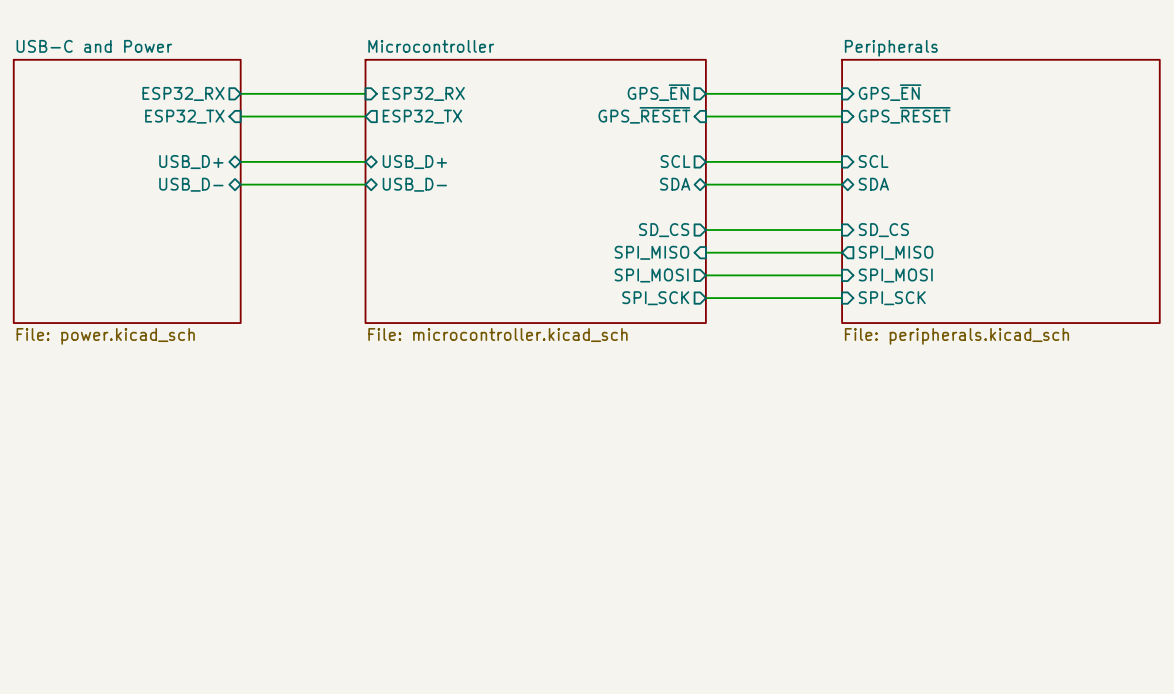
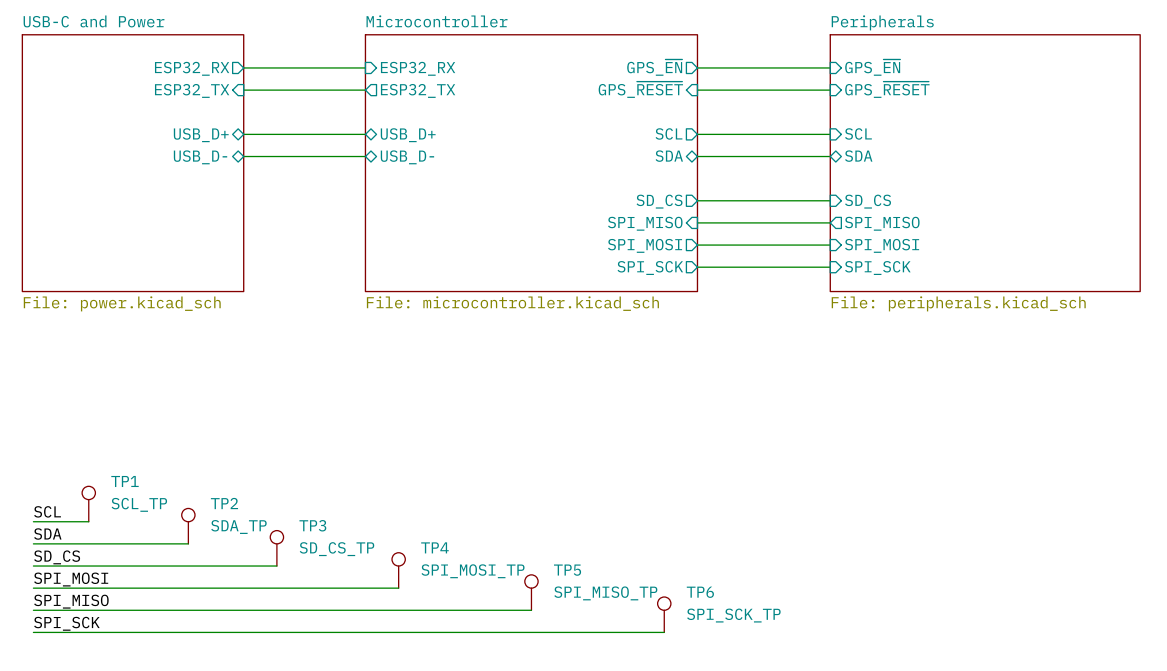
TP1: none -> SCL_TP (88, 504)
label: none -> SCL (47, 511)
wire: none -> (33, 521) (88, 521)
TP2: none -> SDA_TP (188, 526)
label: none -> SDA (47, 534)
wire: none -> (33, 543) (188, 543)
TP3: none -> SD_CS_TP (276, 548)
label: none -> SD_CS (57, 557)
wire: none -> (33, 566) (276, 566)
TP4: none -> SPI_MOSI_TP (398, 570)
label: none -> SPI_MOSI (71, 579)
wire: none -> (33, 588) (398, 588)
TP5: none -> SPI_MISO_TP (531, 592)
label: none -> SPI_MISO (71, 601)
wire: none -> (33, 610) (531, 610)
TP6: none -> SPI_SCK_TP (664, 614)
label: none -> SPI_SCK (66, 623)
wire: none -> (33, 632) (664, 632)

